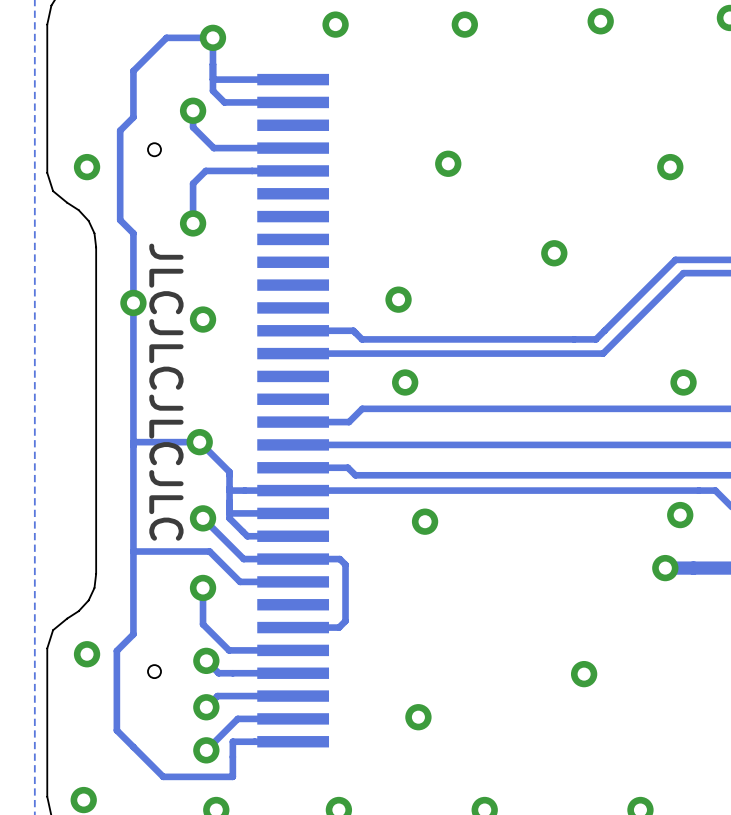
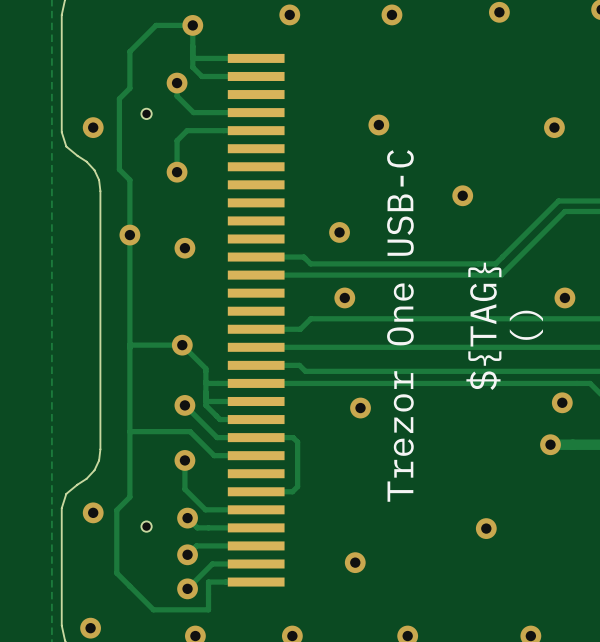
text: JLCJLCJLCJLC (166, 392) -> none
text: none -> ${TAG} (483, 326)
text: none -> () (526, 325)
text: none -> Trezor One USB-C (400, 325)

